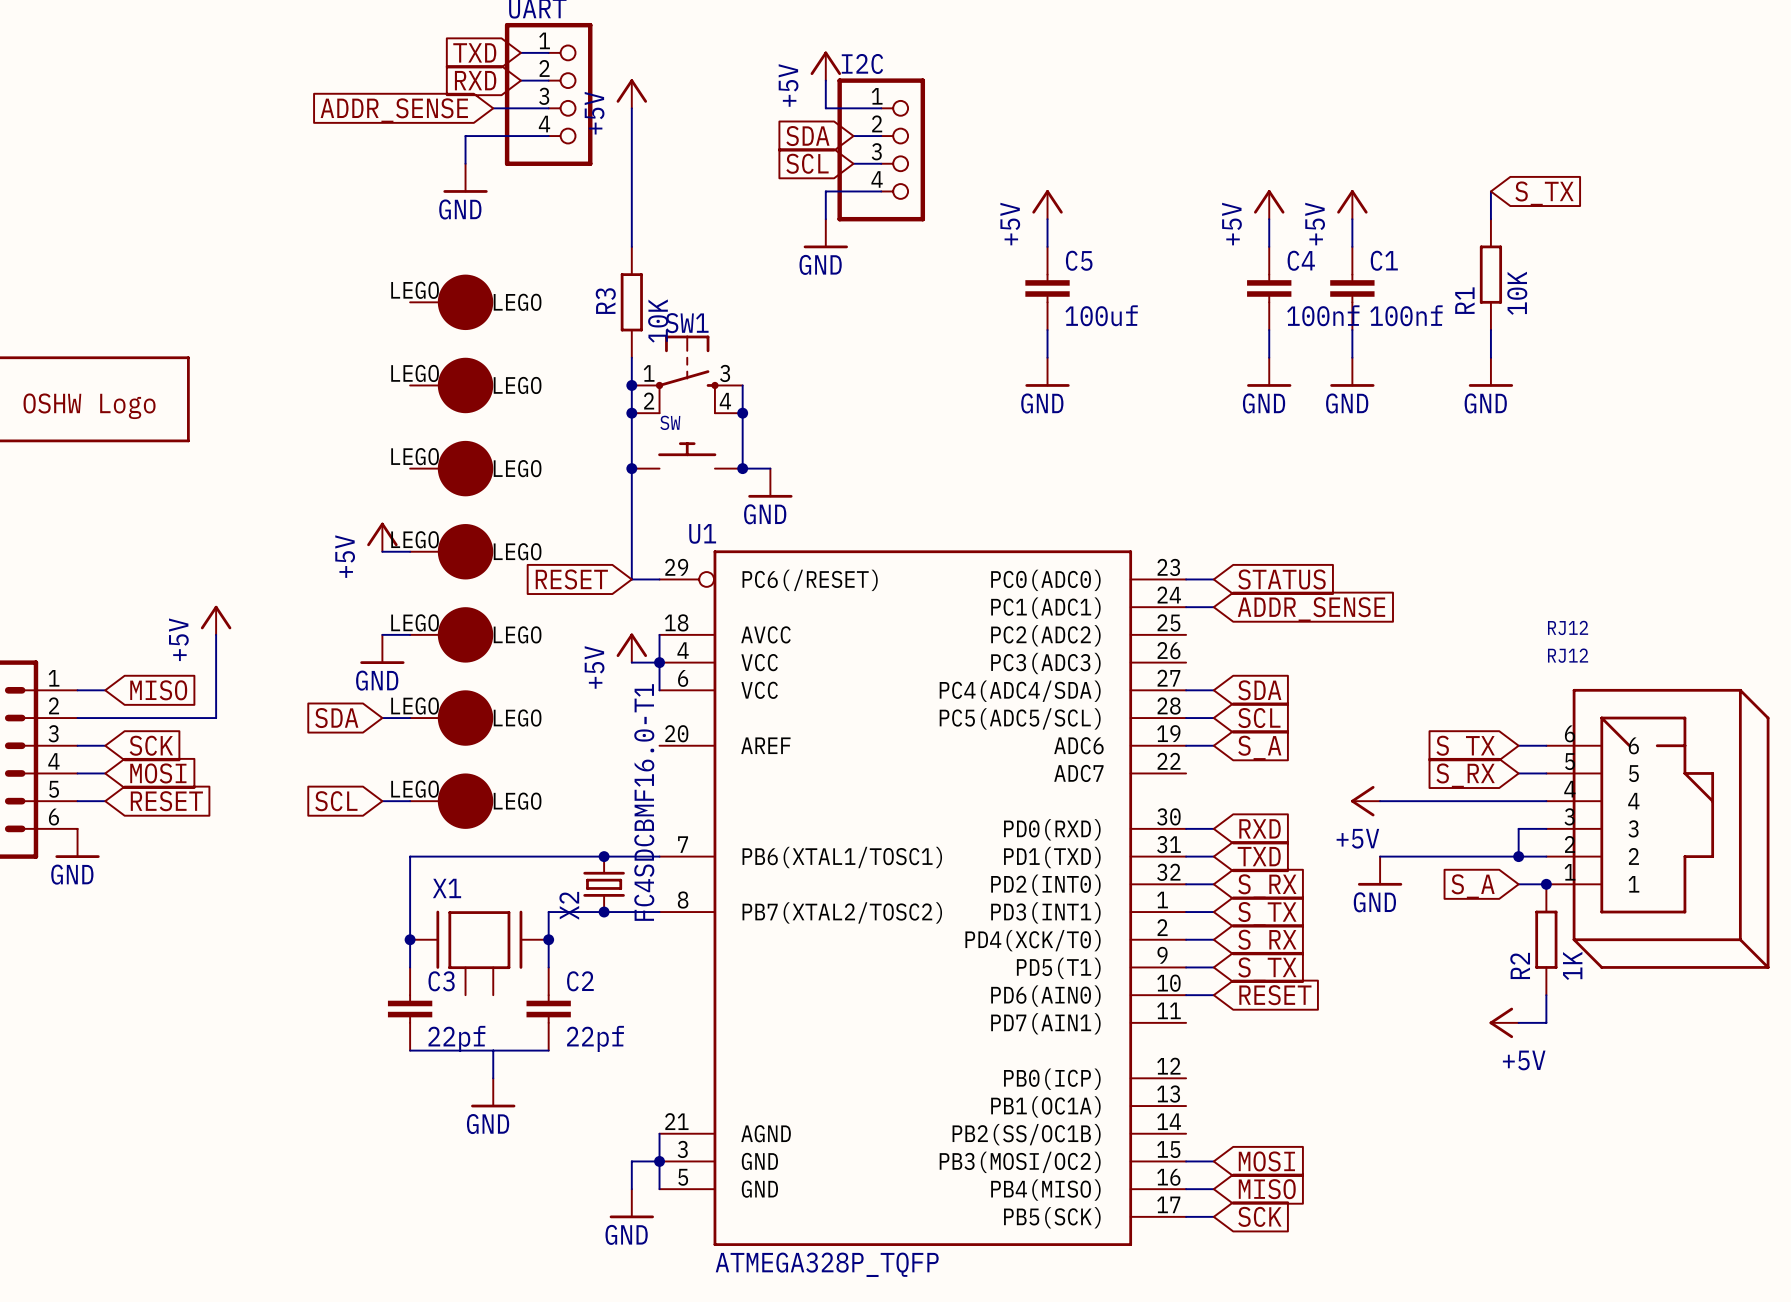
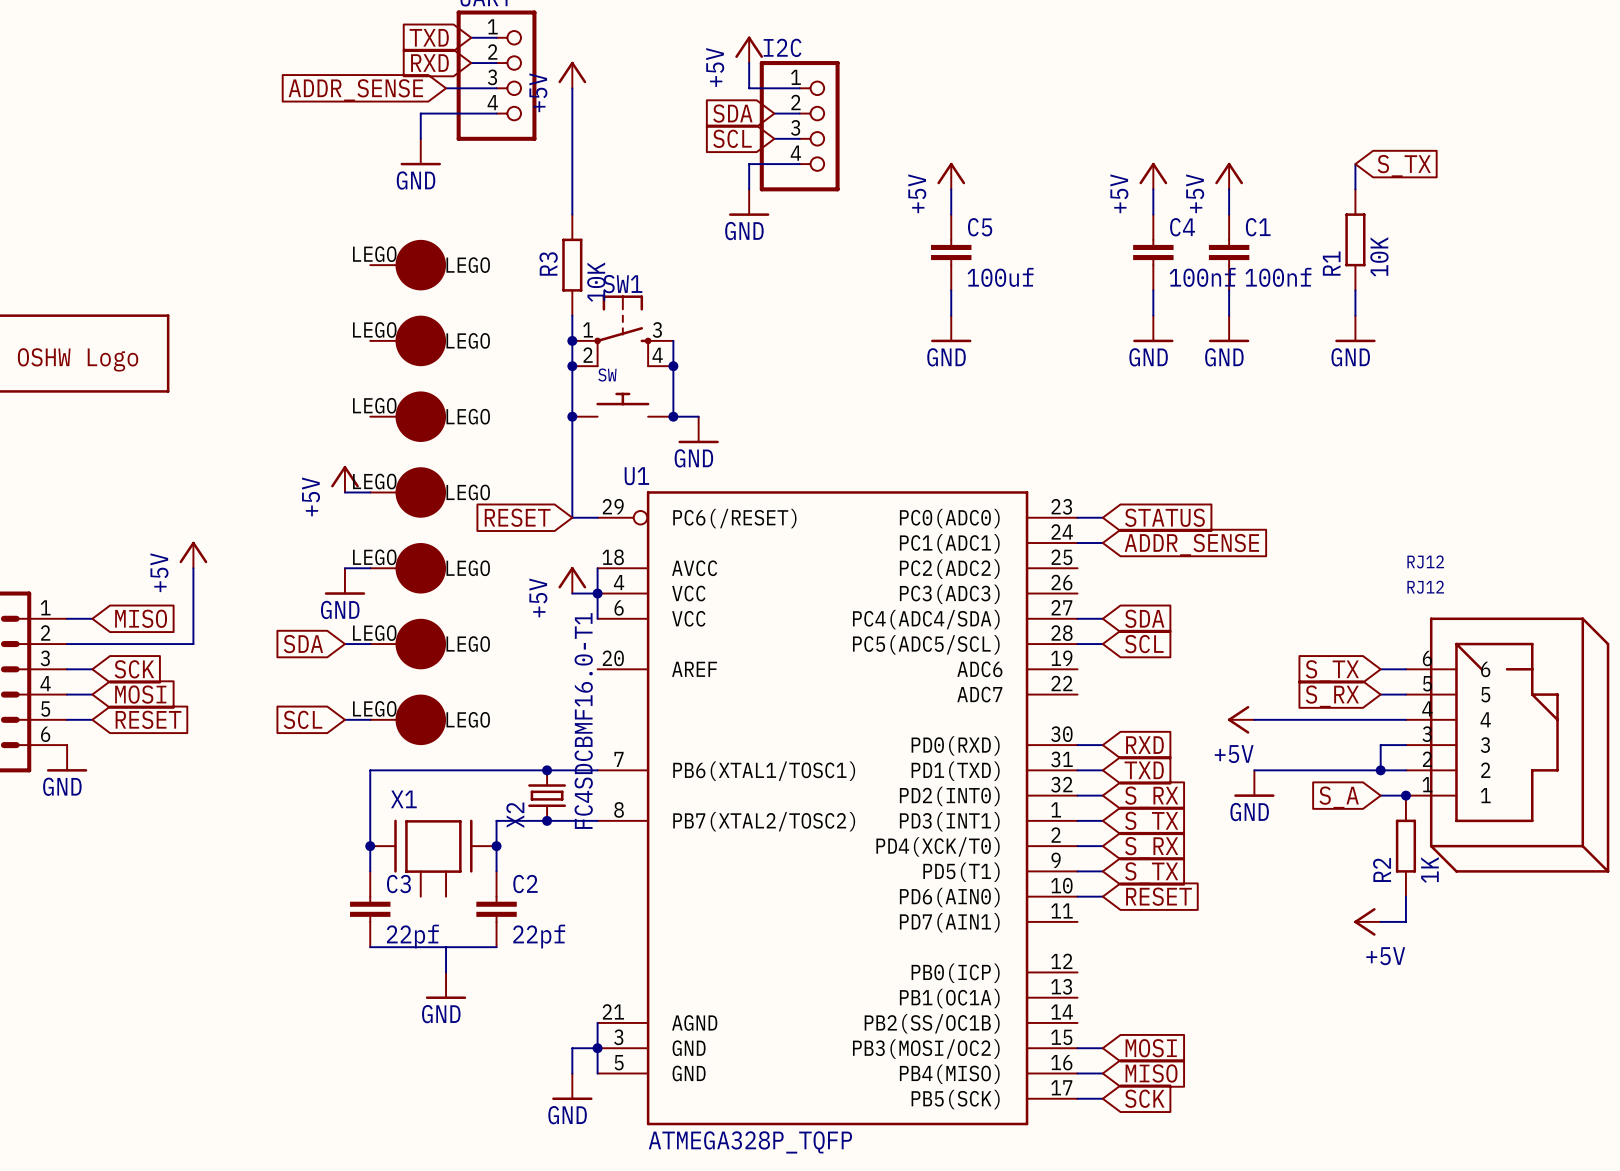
wire: (1186, 745) (1213, 745) -> none
global label: S_A (1259, 747) -> none

